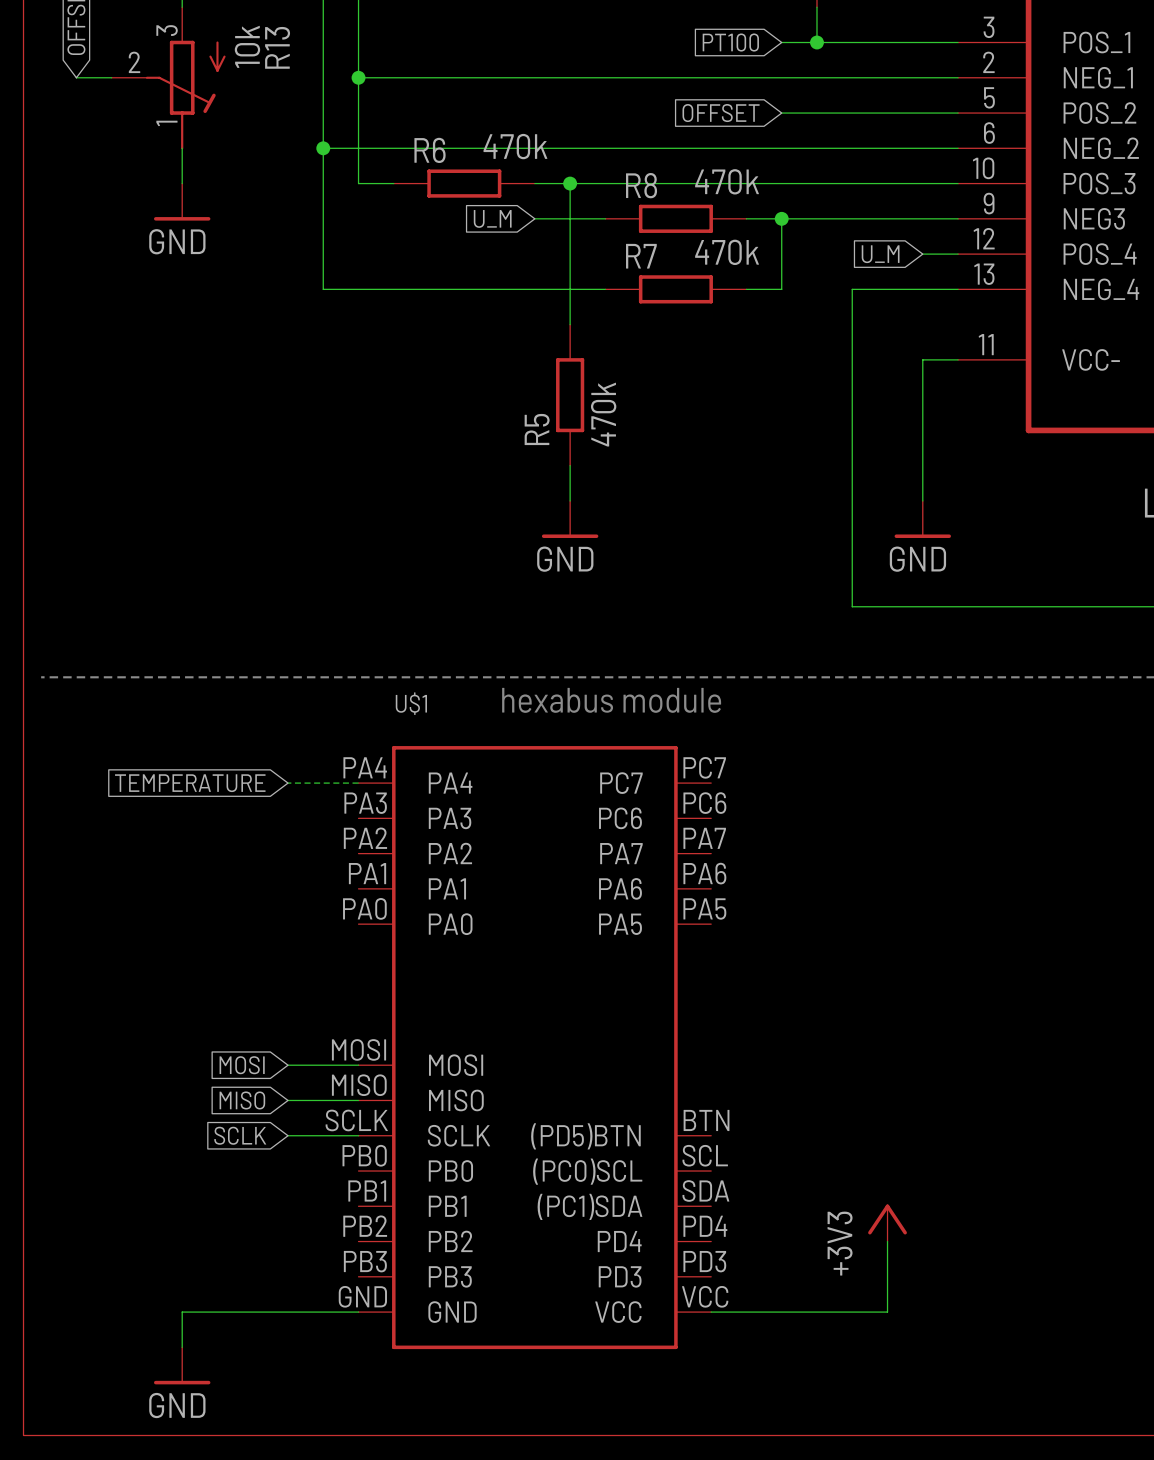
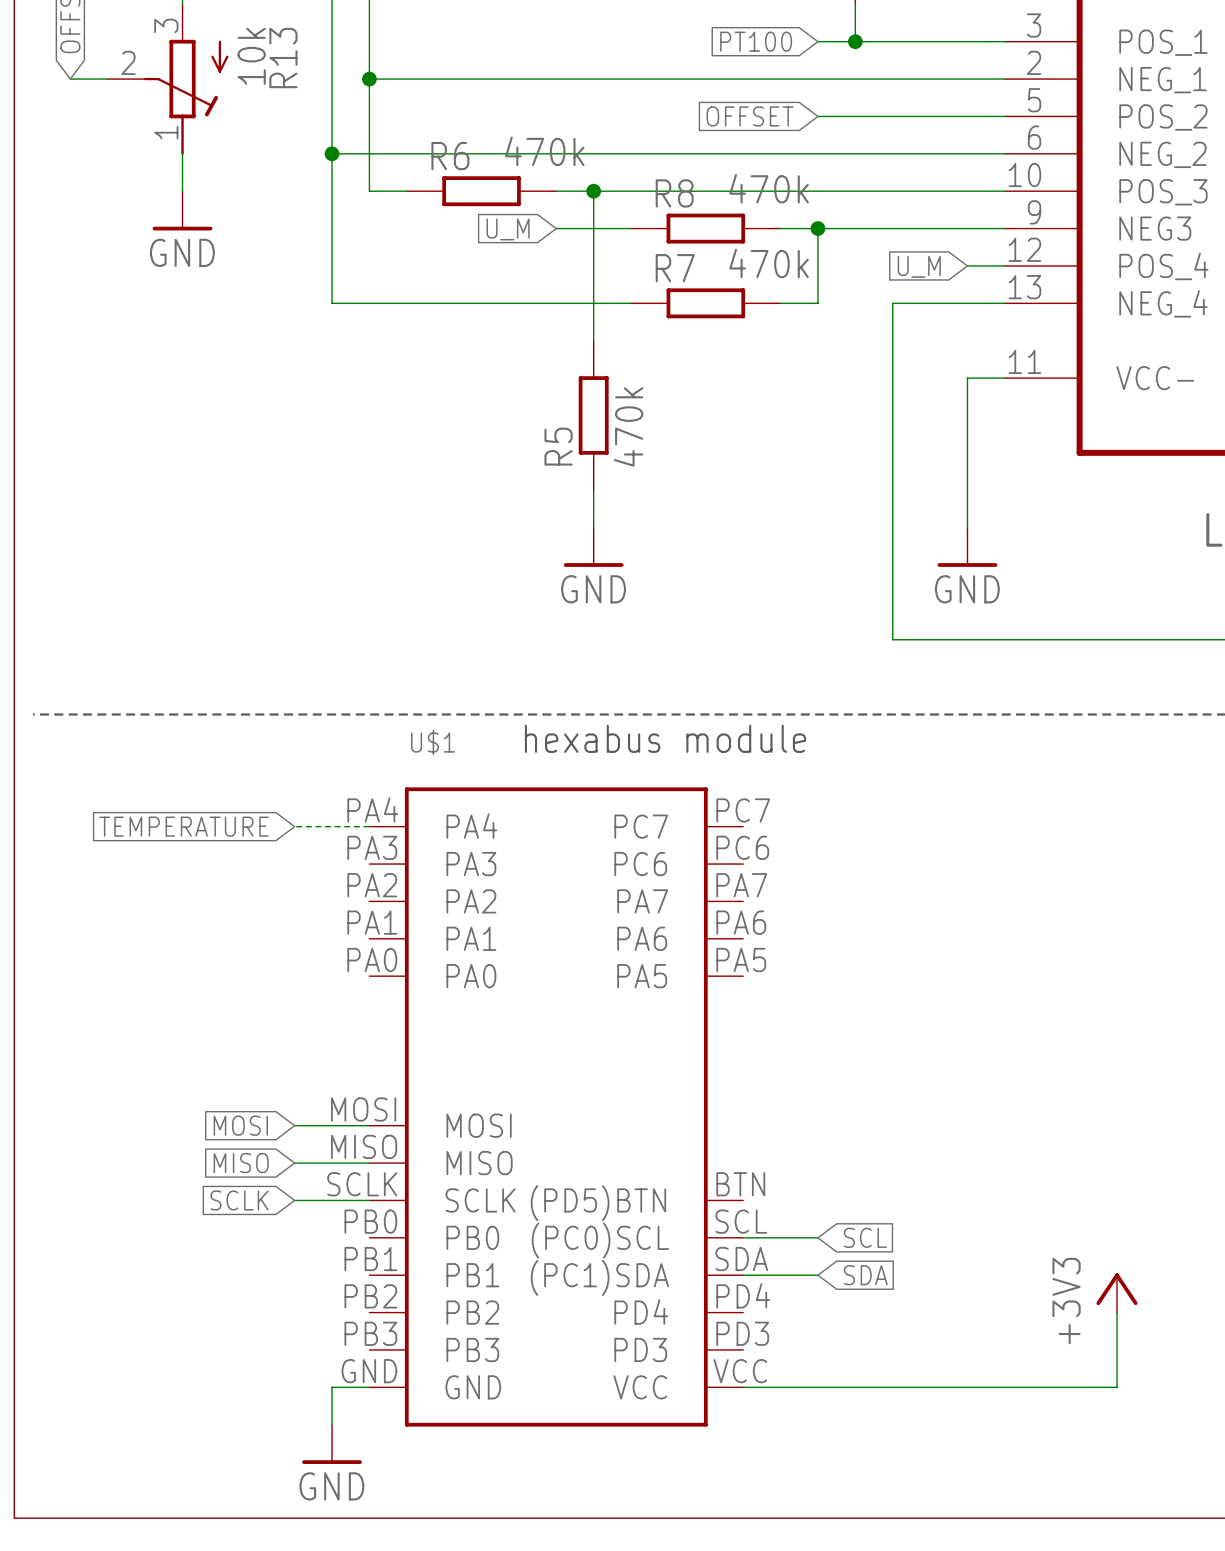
wire: none -> (743, 1237) (817, 1237)
global label: none -> SCL (865, 1237)
wire: none -> (743, 1275) (817, 1275)
global label: none -> SDA (865, 1275)
power symbol position: +3V3 (887, 1223) -> +3V3 (1117, 1292)
wire: (887, 1241) (887, 1312) -> (1117, 1312) (1117, 1387) (930, 1387)
wire: (323, 1312) (182, 1312) (182, 1347) -> (332, 1387) (332, 1424)
power symbol position: GND (182, 1365) -> GND (332, 1444)

